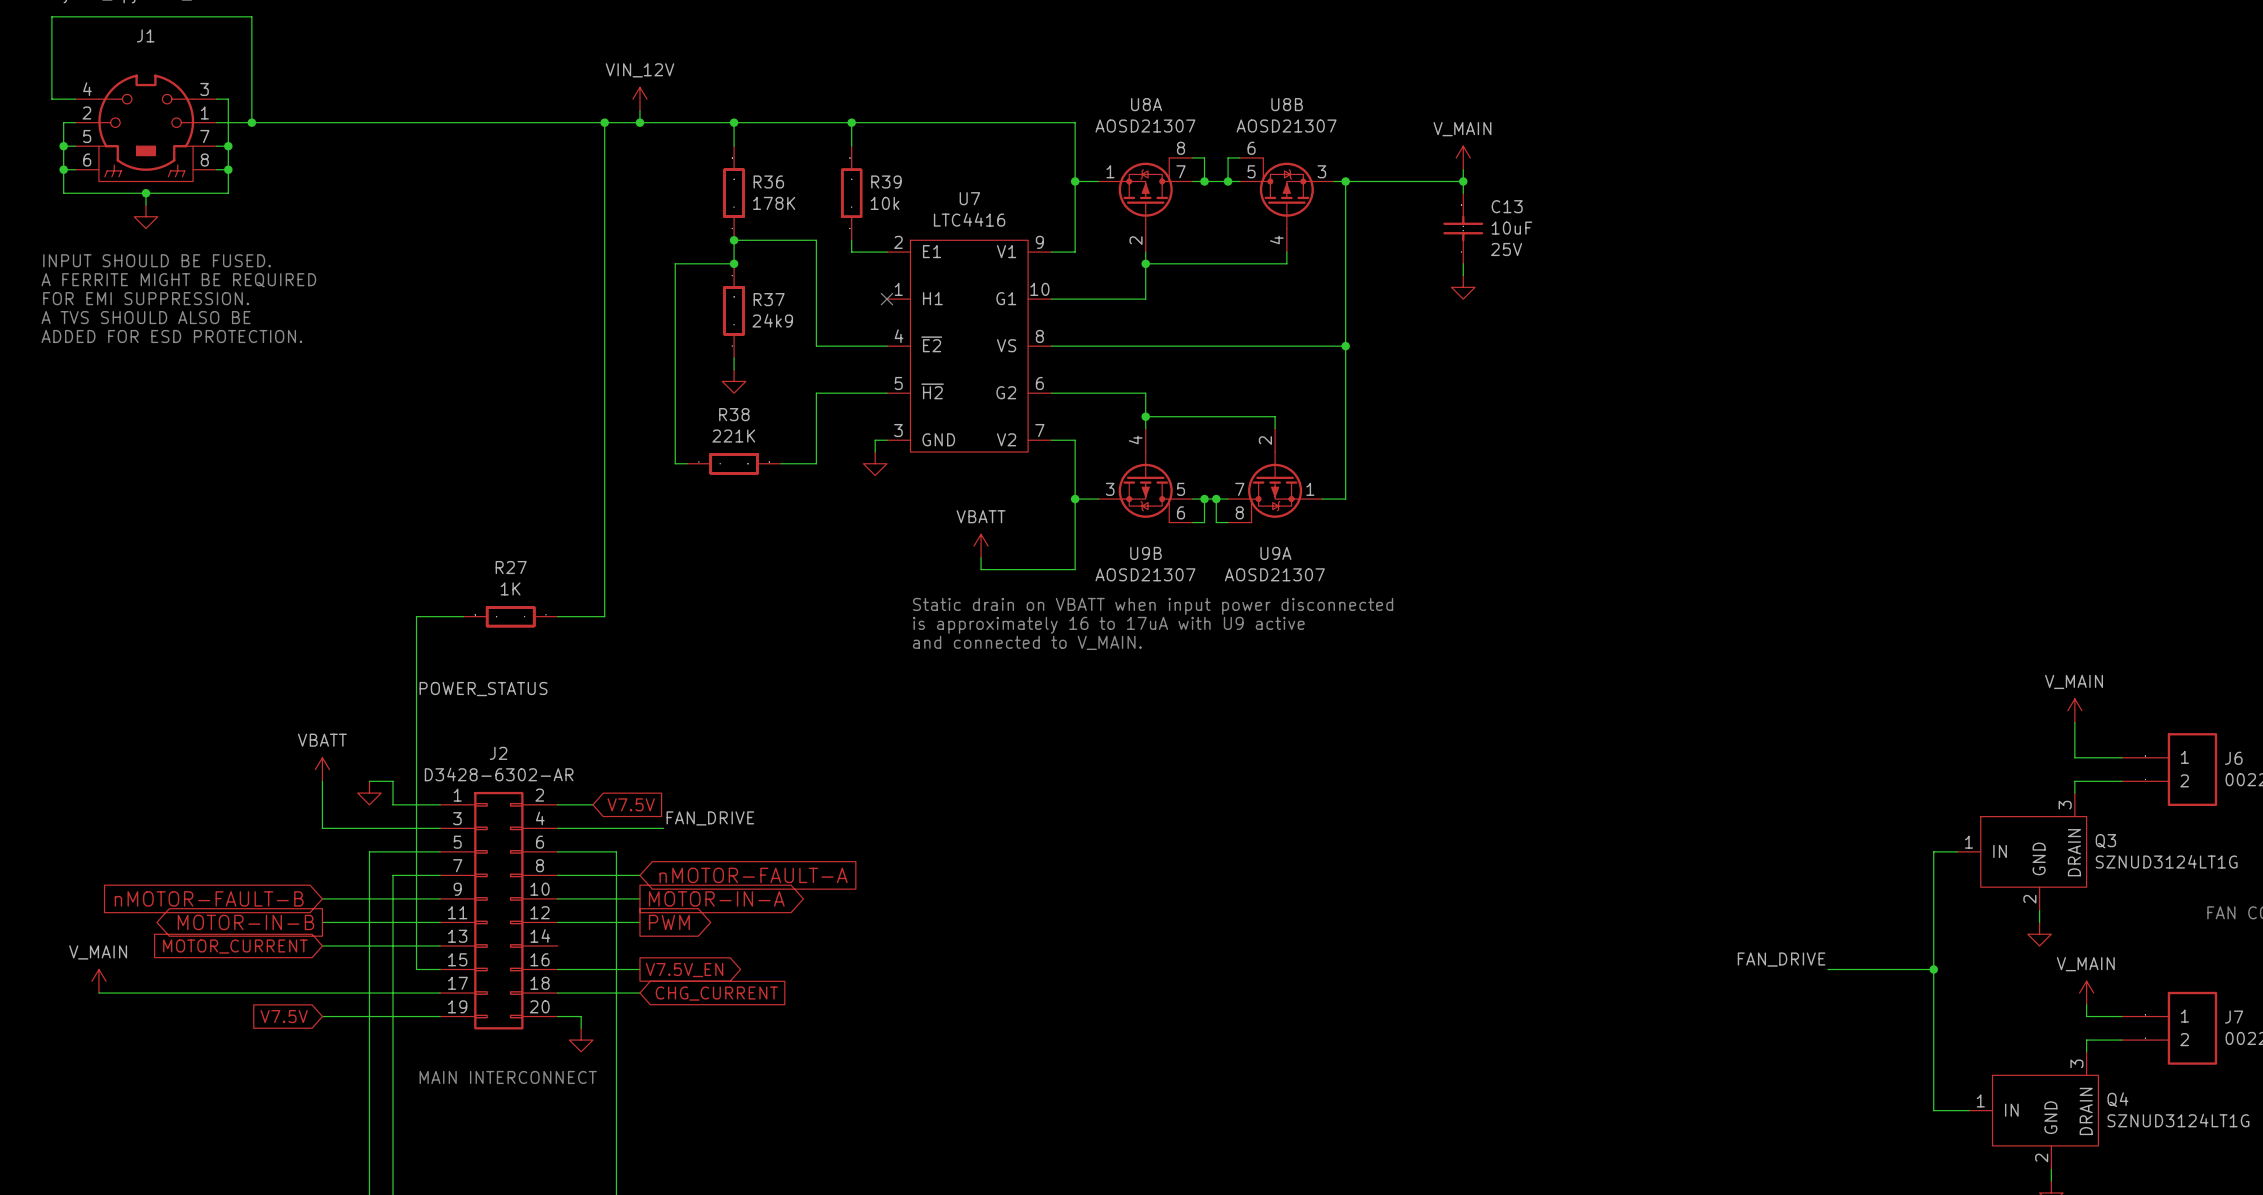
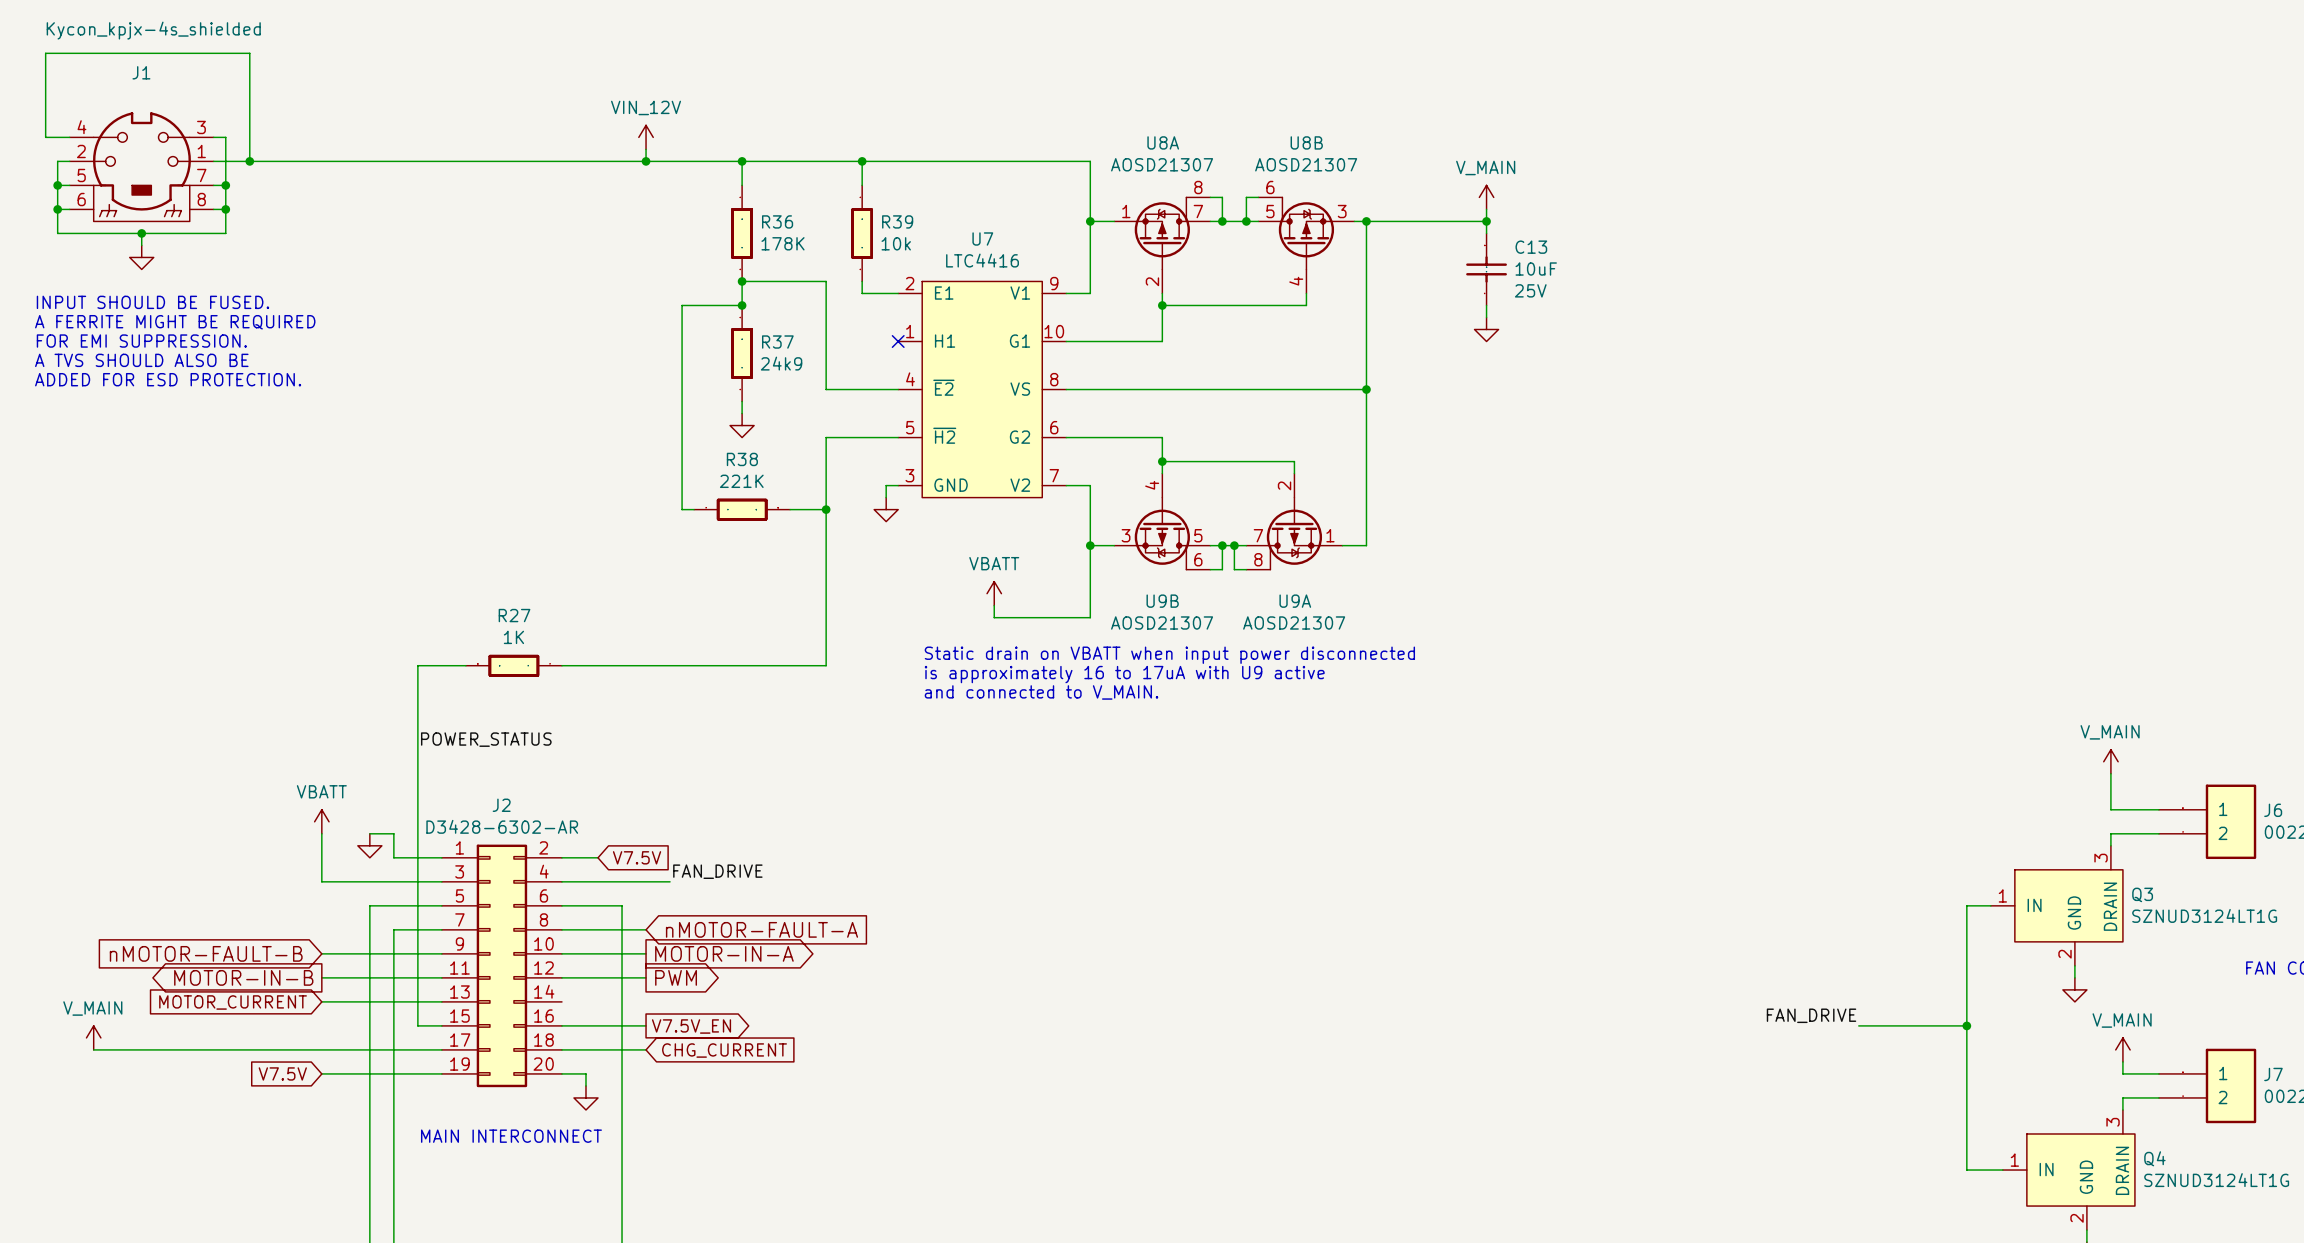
wire: (604, 122) (604, 616) -> (826, 509) (826, 665) (610, 665)
junction: (604, 122) -> none
junction: none -> (826, 509)

